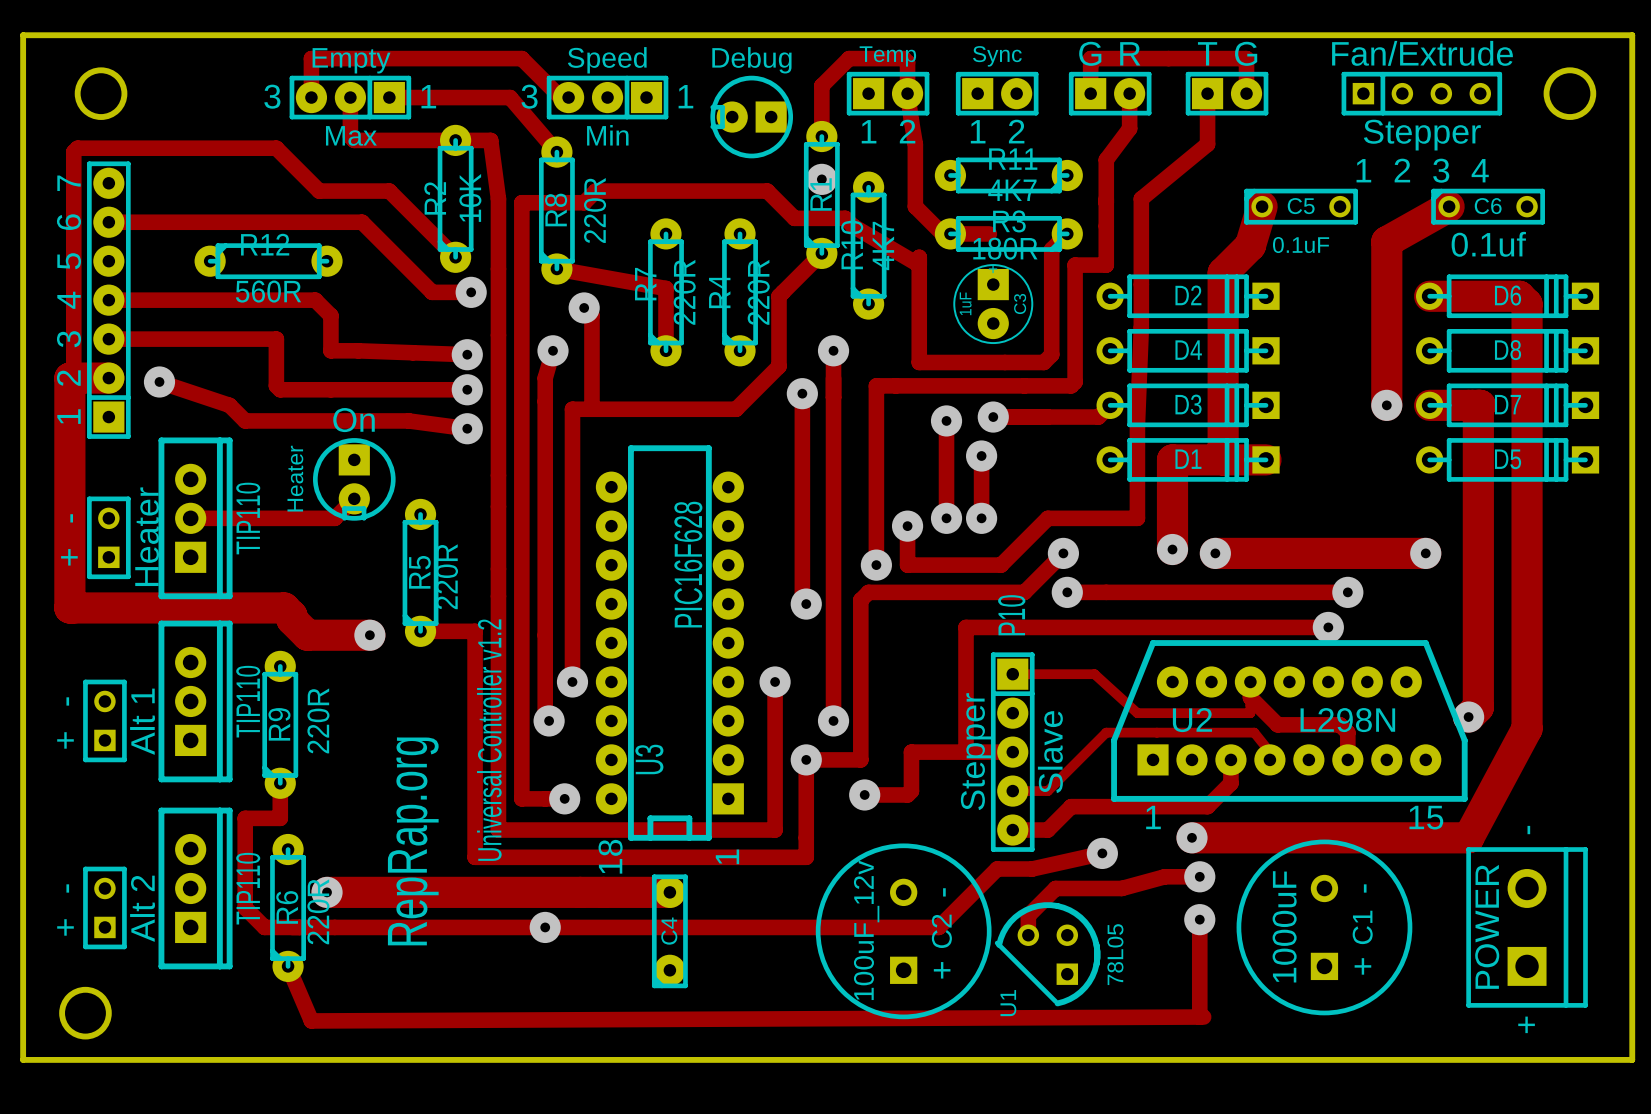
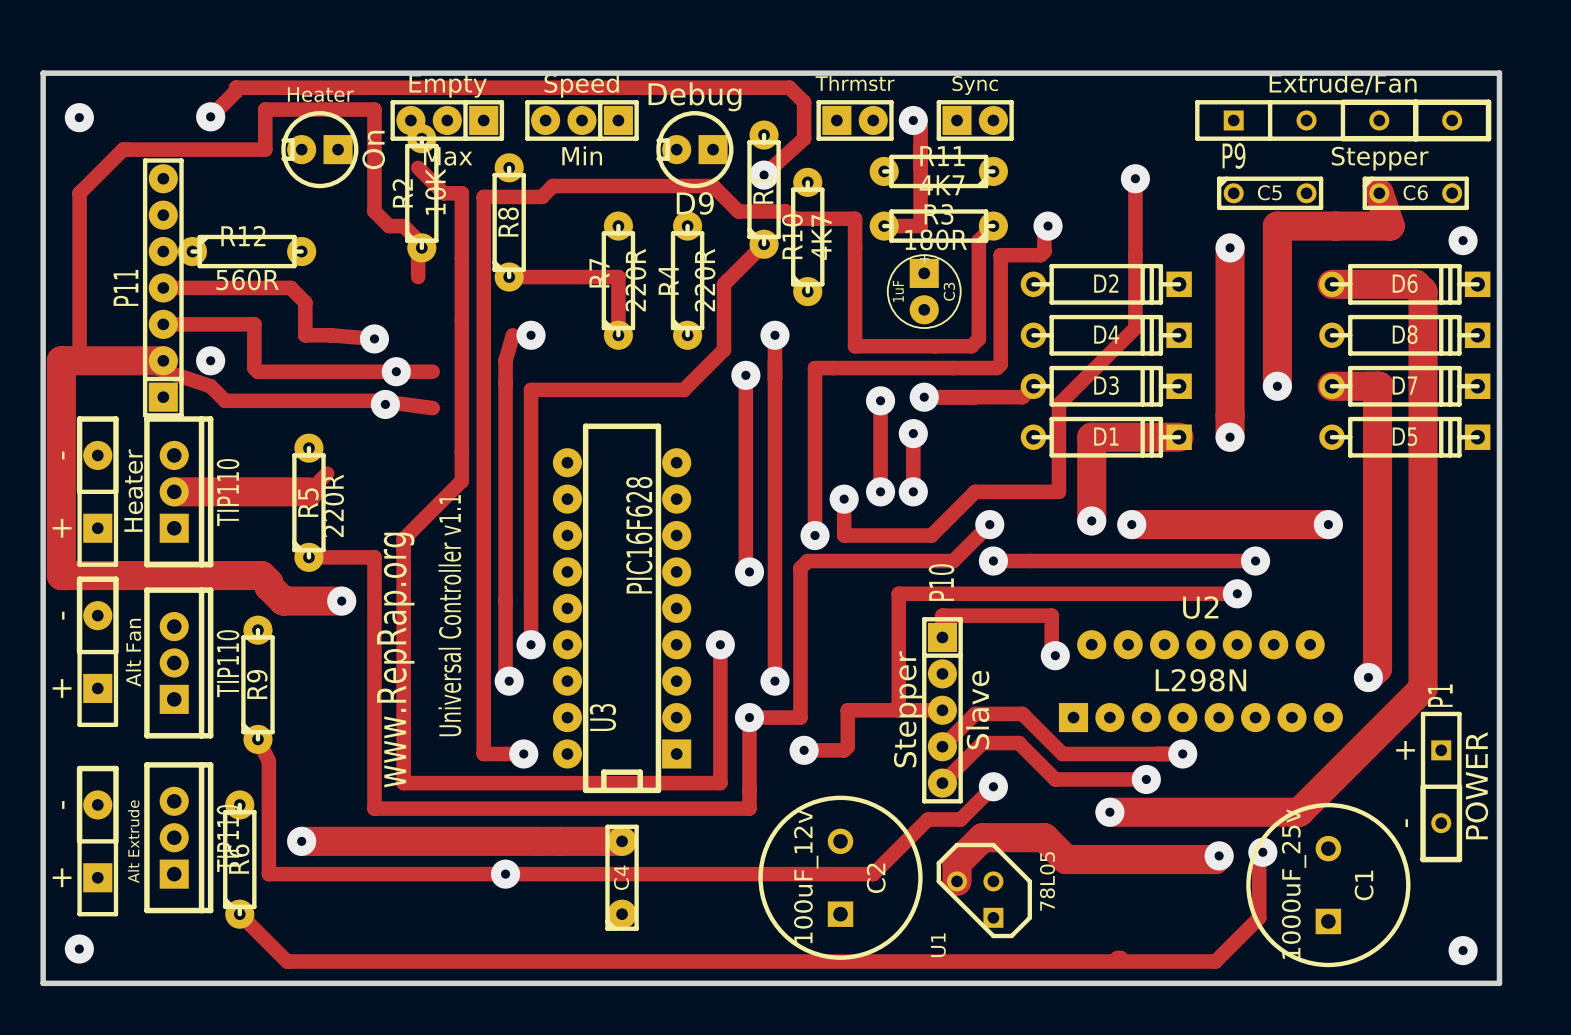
board edge: (23, 35) (1632, 35) (1632, 1059) (23, 1059) (23, 35) -> (43, 73) (43, 983) (1499, 983) (1499, 73) (43, 73)
round board edge: [74, 67, 128, 120] -> none
round board edge: [1543, 67, 1597, 120] -> none
part: (888, 93) -> none
part: (997, 93) -> none
track: (1090, 93) (1090, 58) (1246, 58) (1246, 93) -> none
part: (1110, 93) -> none
track: (1129, 93) (1129, 128) (1106, 159) (1106, 265) -> (1048, 226) (1044, 226) (1044, 251) (1040, 255) (1029, 255)
track: (1207, 93) (1207, 144) (1141, 198) (1141, 327) (1137, 424) -> (1135, 178) (1135, 328) (1058, 404)
part: (1227, 93) -> none
part: (1421, 93) -> none
track: (311, 97) (311, 58) (521, 58) (560, 97) (568, 97) -> none
track: (350, 97) (350, 136) (354, 140) (490, 140) (498, 198) -> (418, 167) (443, 193) (461, 193)
part: (350, 97) -> none
track: (389, 97) (510, 97) (556, 152) -> none
part: (607, 97) -> none
via: none -> (79, 117)
track: none -> (210, 116) (236, 91) (236, 87) (789, 87) (804, 102) (804, 138) (764, 175)
via: none -> (210, 116)
part: (751, 117) -> none
part: none -> (447, 120)
part: none -> (582, 120)
part: none -> (855, 120)
track: none -> (913, 120) (920, 127) (920, 226)
via: none -> (913, 120)
part: none -> (975, 120)
P9: none -> (1343, 120)
track: (821, 136) (821, 85) (849, 58) (903, 58) (907, 62) (907, 93) (915, 144) (915, 206) (942, 233) (950, 233) -> none
D9: none -> (694, 149)
via: none -> (1135, 178)
track: none -> (1379, 193) (1390, 226) (1277, 226) (1277, 386)
track: (1262, 206) (1250, 245) (1223, 272) (1223, 459) -> none
C5 position: (1301, 206) -> (1270, 193)
track: (1449, 206) (1386, 241) (1386, 405) -> none
C6 position: (1488, 206) -> (1415, 193)
R8 position: (556, 210) -> (509, 222)
R8 value: 220R (595, 210) -> none
track: (108, 222) (362, 222) (432, 292) (471, 292) -> none
track: (853, 226) (919, 265) -> (793, 218) (855, 218) (855, 247)
via: none -> (1048, 226)
C6 text: 0.1uf (1488, 244) -> none
C5 value: 0.1uF (1301, 245) -> none
via: none -> (1463, 240)
track: (455, 257) (389, 191) (319, 191) (276, 148) (77, 148) (73, 152) (73, 374) (69, 378) -> none
track: none -> (1230, 247) (1230, 437)
via: none -> (1230, 247)
track: (556, 268) (665, 288) -> (509, 277) (618, 277)
track: none -> (418, 277) (418, 240) (403, 226) (389, 226) (374, 211) (374, 109) (265, 109) (265, 149) (123, 149) (79, 193) (79, 360) (163, 360) (97, 360)
via: (471, 292) -> none
track: (108, 300) (178, 300) -> none
part: (108, 300) -> none
P11: none -> (163, 287)
track: (584, 307) (591, 315) (591, 409) -> none
via: (584, 307) -> none
track: (108, 339) (178, 339) -> none
track: (358, 350) (467, 354) -> (330, 335) (374, 338)
via position: (553, 350) -> (531, 335)
via: none -> (374, 338)
via: (467, 354) -> none
via position: (159, 381) -> (210, 360)
via: none -> (396, 371)
via: (467, 389) -> none
via position: (1386, 405) -> (1277, 386)
via: none -> (385, 404)
via: (467, 428) -> none
via: none -> (1230, 437)
part rotation: 0° (354, 479) -> 90° clockwise (319, 149)
part position: (354, 479) -> (319, 149)
track: (498, 506) (498, 830) -> (461, 480) (403, 539) (403, 783) (461, 783)
part: none -> (97, 491)
track width: thin (190, 518) (334, 518) -> thick (174, 491) (308, 491)
part: (108, 537) -> none
R5 position: (420, 572) -> (308, 502)
track: (420, 631) (475, 631) (475, 857) -> (308, 557) (374, 557) (374, 808) (440, 808)
U2 footprint: [1111, 640, 1468, 802] -> [1058, 630, 1343, 733]
track: (1012, 674) (1094, 674) (1137, 713) (1250, 713) (1250, 681) (1250, 697) (1277, 724) (1340, 724) (1347, 732) (1347, 759) -> (942, 637) (942, 615) (1051, 615) (1051, 652) (1055, 655)
part: none -> (97, 651)
via: none -> (1055, 655)
part: (104, 720) -> none
R9 value: 220R (318, 720) -> none
U2 name position: U2 (1192, 720) -> U2 (1200, 607)
U2 value position: L298N (1347, 720) -> L298N (1200, 680)
track: (1527, 728) (1468, 837) (1191, 837) -> (1423, 688) (1299, 812) (1109, 812)
text: Universal Controller v1.2 (489, 740) -> Universal Controller v1.1 (449, 615)
track: (1230, 759) (1230, 783) (1207, 806) (1071, 806) (1047, 830) (1012, 830) -> (1146, 779) (1055, 779) (1018, 743) (982, 743) (942, 783)
track: (1269, 759) (1269, 752) (1254, 732) (1106, 732) (1047, 791) (1012, 791) -> (1182, 753) (1062, 753) (1022, 713) (975, 713) (942, 746)
track: (280, 783) (280, 818) (245, 818) (245, 907) (264, 927) (291, 927) -> (257, 739) (268, 761) (268, 874)
via: none -> (1182, 753)
via: none -> (1146, 779)
P1: none -> (1441, 787)
via: (1191, 837) -> none
text: RepRap.org (413, 841) -> www.RepRap.org (395, 660)
track: (1102, 853) (1032, 869) -> (993, 786) (960, 819)
via position: (1102, 853) -> (993, 786)
U3 text: 18 (610, 856) -> none
U3 text: 1 (727, 856) -> none
via: none -> (1109, 812)
track: (1199, 876) (1164, 876) (1121, 888) -> (1219, 855) (1215, 859) (1066, 859) (1044, 837)
via: (1199, 876) -> none
track width: thin (1121, 888) (1055, 888) (1028, 915) (1028, 935) -> thick (1044, 837) (982, 837) (957, 863) (957, 881)
C1 text: - (1365, 888) -> none
part: none -> (97, 841)
C2 text: - (944, 892) -> none
U1 footprint: [994, 902, 1101, 1007] -> [936, 842, 1033, 939]
track: none -> (1262, 852) (1259, 855) (1259, 917) (1215, 961) (287, 961) (239, 914)
via: none -> (1262, 852)
part: (104, 907) -> none
R6 position: (288, 907) -> (239, 859)
via: none -> (1219, 855)
R6 value: 220R (318, 911) -> none
track: (1199, 919) (1199, 1017) (311, 1020) (288, 966) -> none
via: (1199, 919) -> none
C1 text: 1000uF (1284, 926) -> none
C1 position: (1324, 927) -> (1328, 885)
part: (1527, 927) -> none
C1 value: none -> 1000uF_25v (1294, 884)
U1 value position: 78L05 (1115, 954) -> 78L05 (1047, 881)
C1 text: + (1362, 966) -> none
C2 text: + (942, 970) -> none
round board edge: [59, 986, 112, 1040] -> none
via: none -> (79, 949)
via: none -> (1463, 950)

